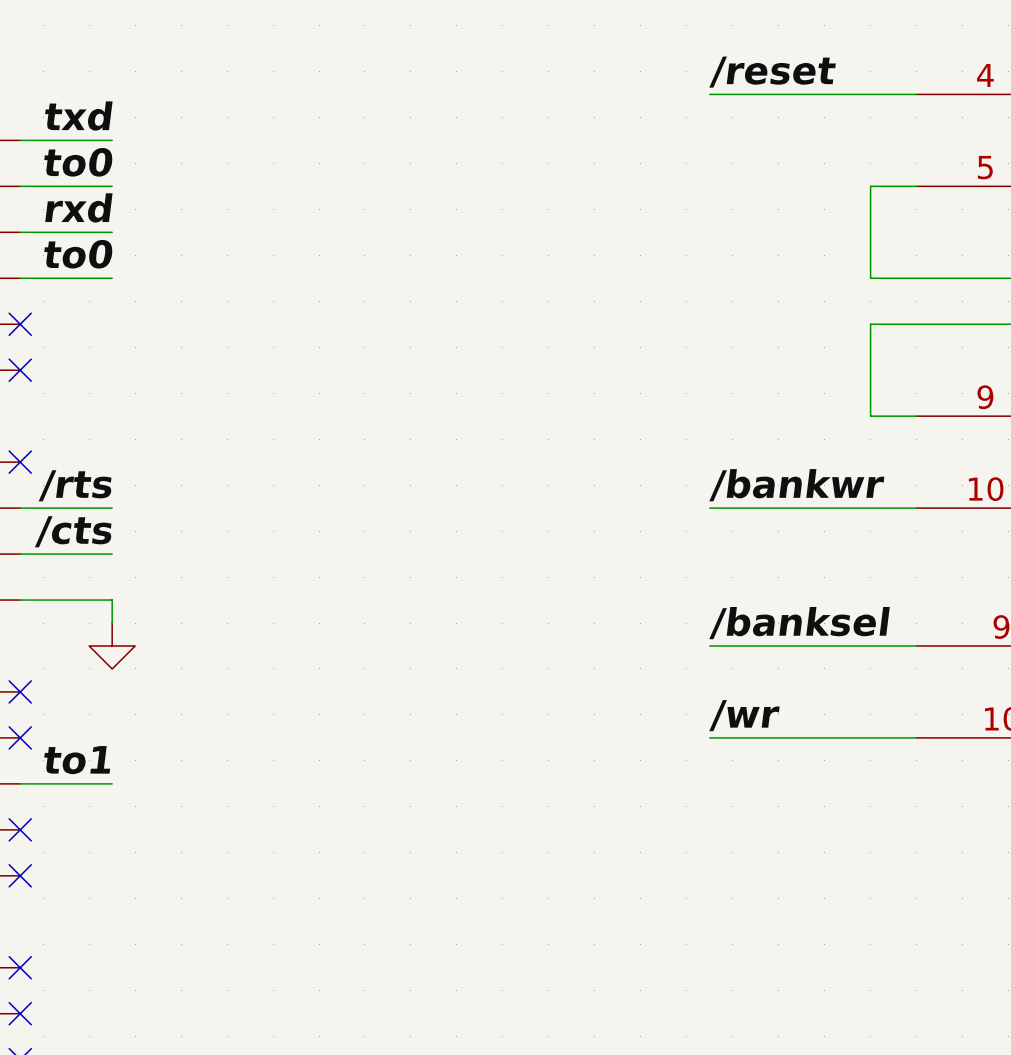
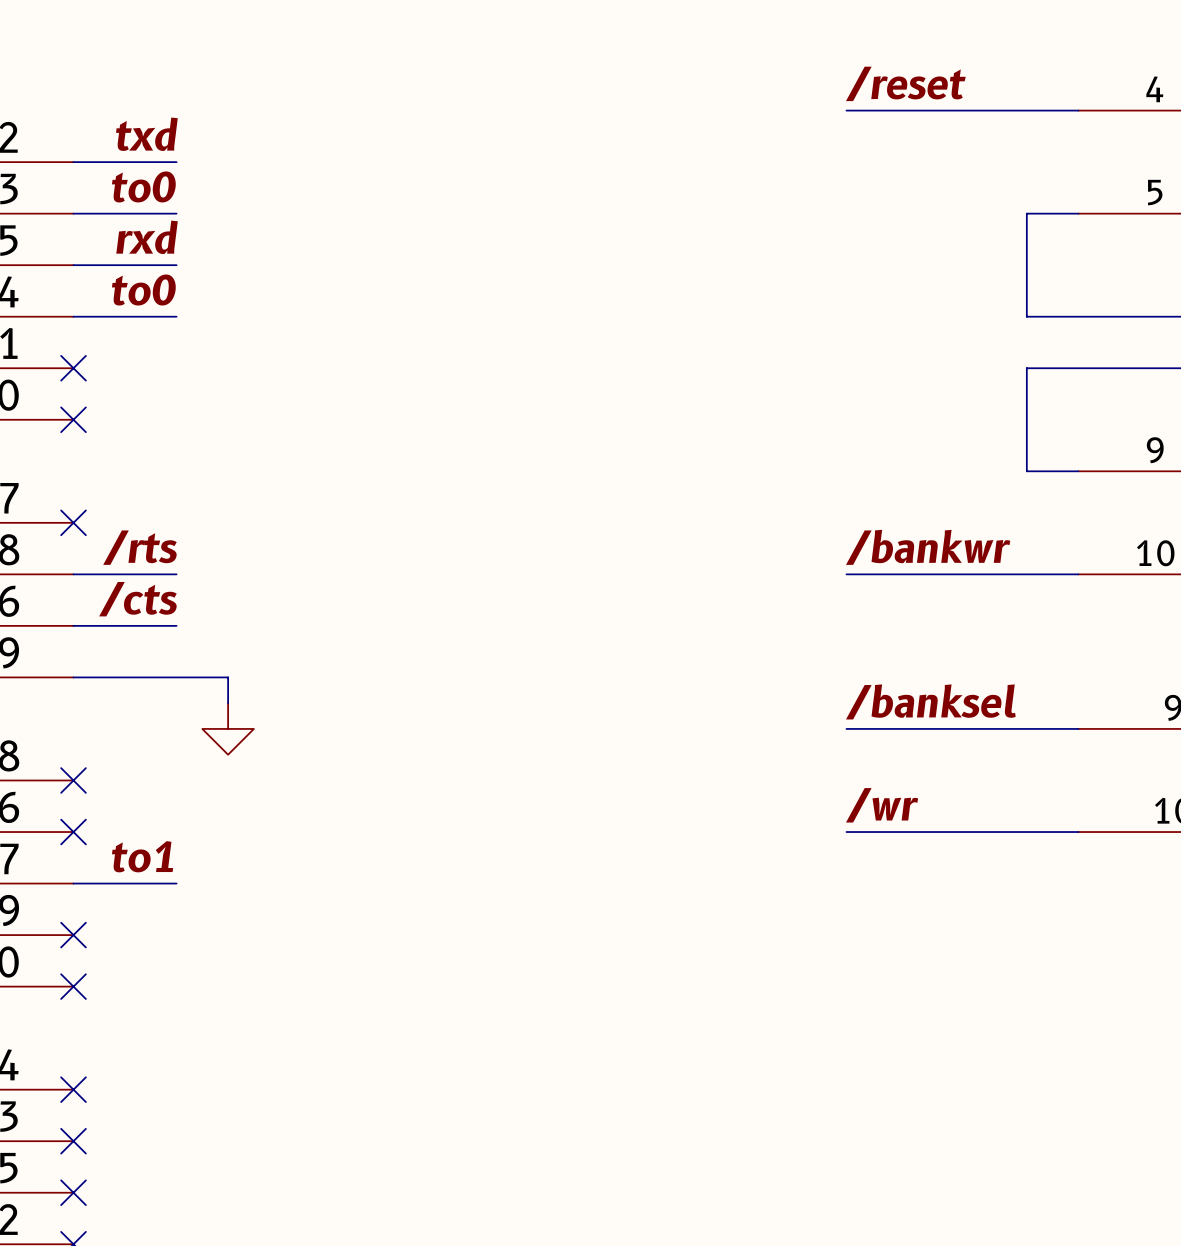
wire: (112, 600) (112, 623) -> (176, 677) (228, 677) (228, 703)
power symbol position: (112, 645) -> (228, 728)

